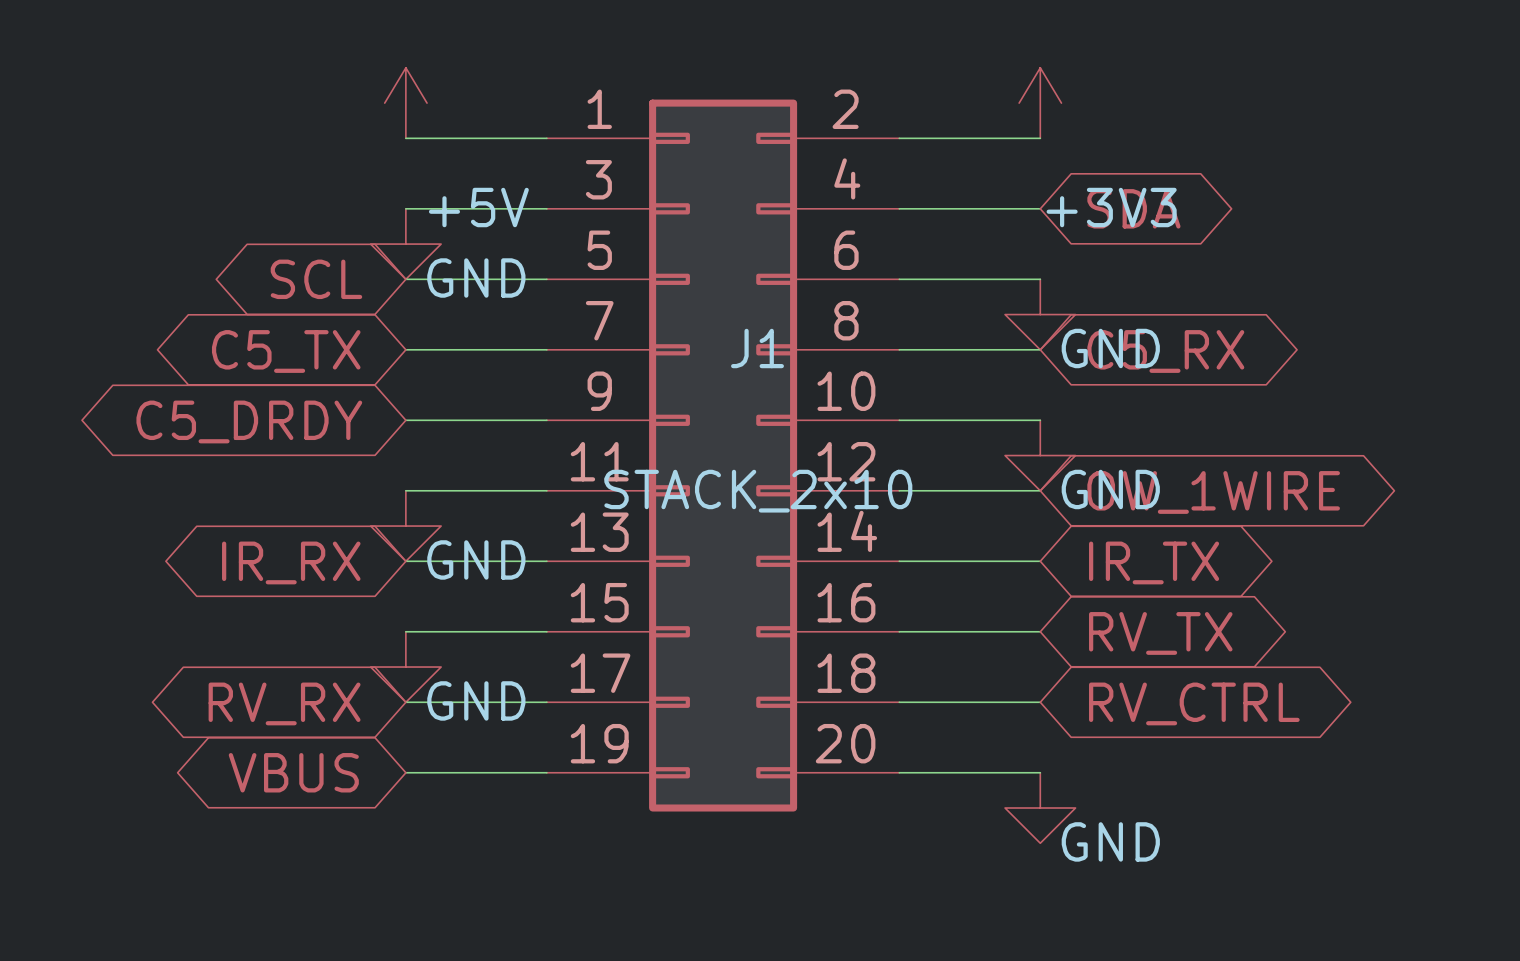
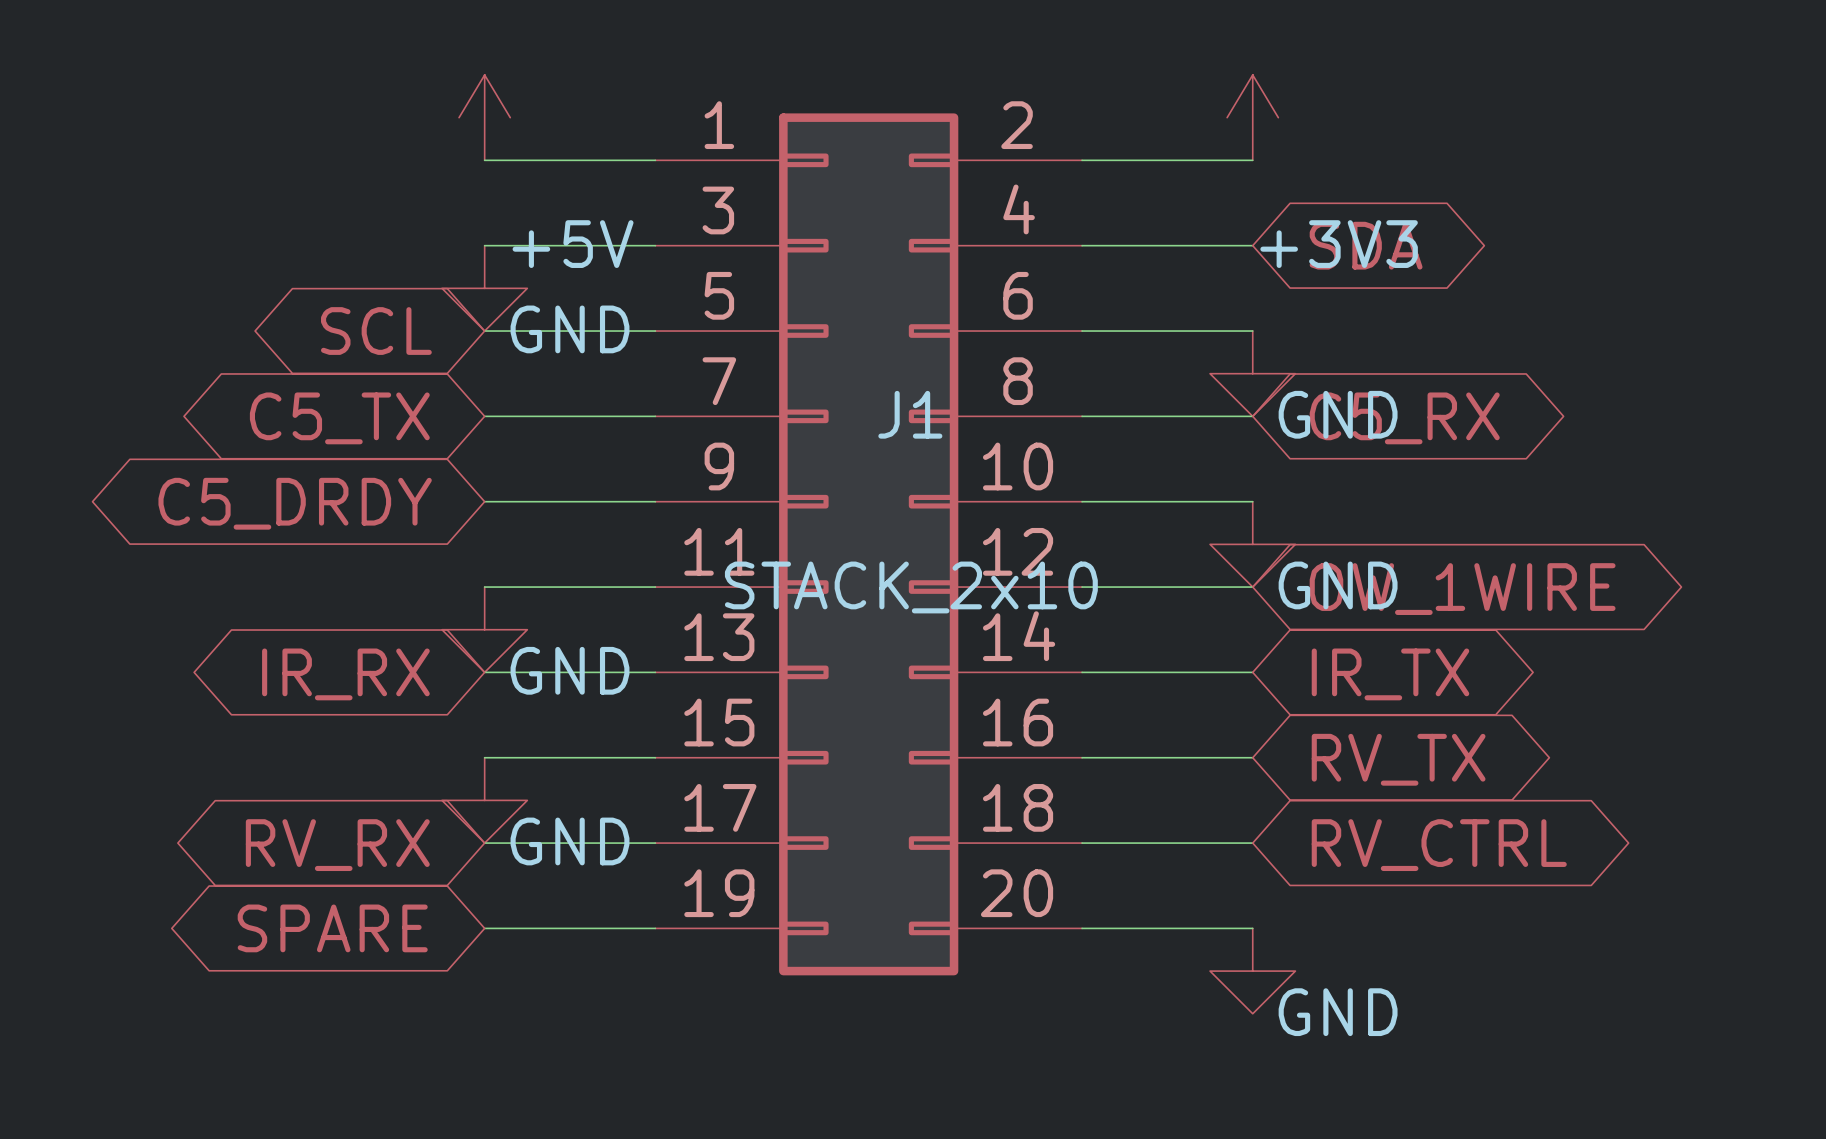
global label: VBUS (293, 772) -> SPARE (332, 928)

